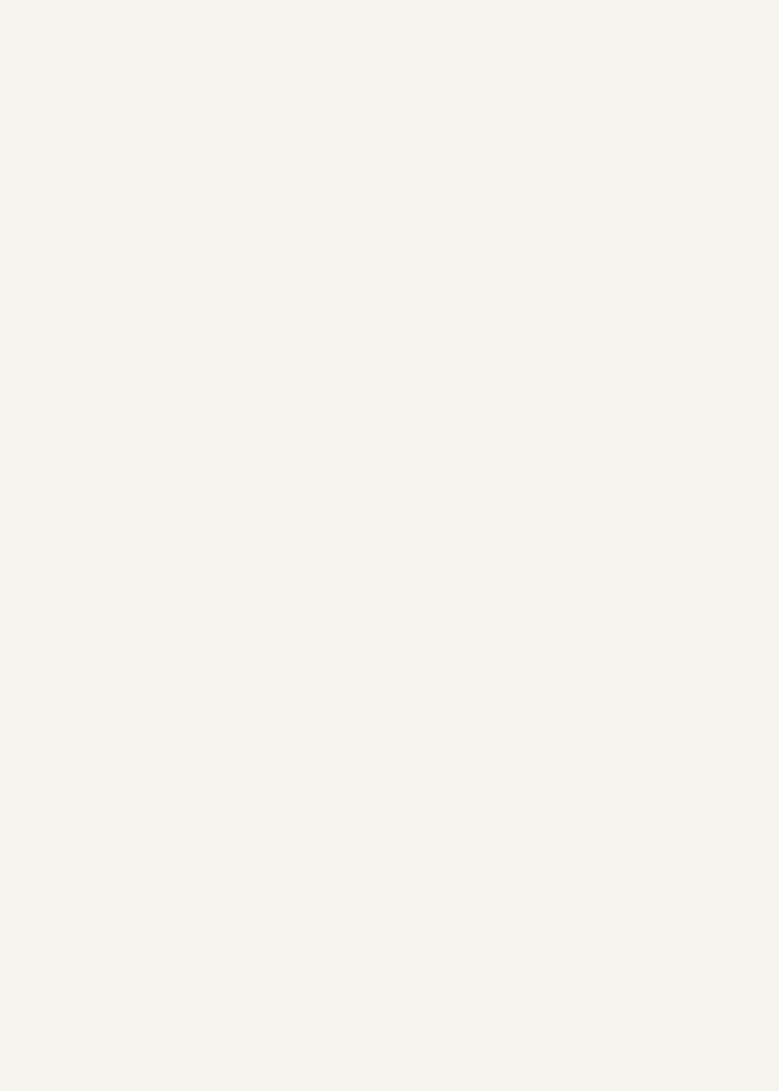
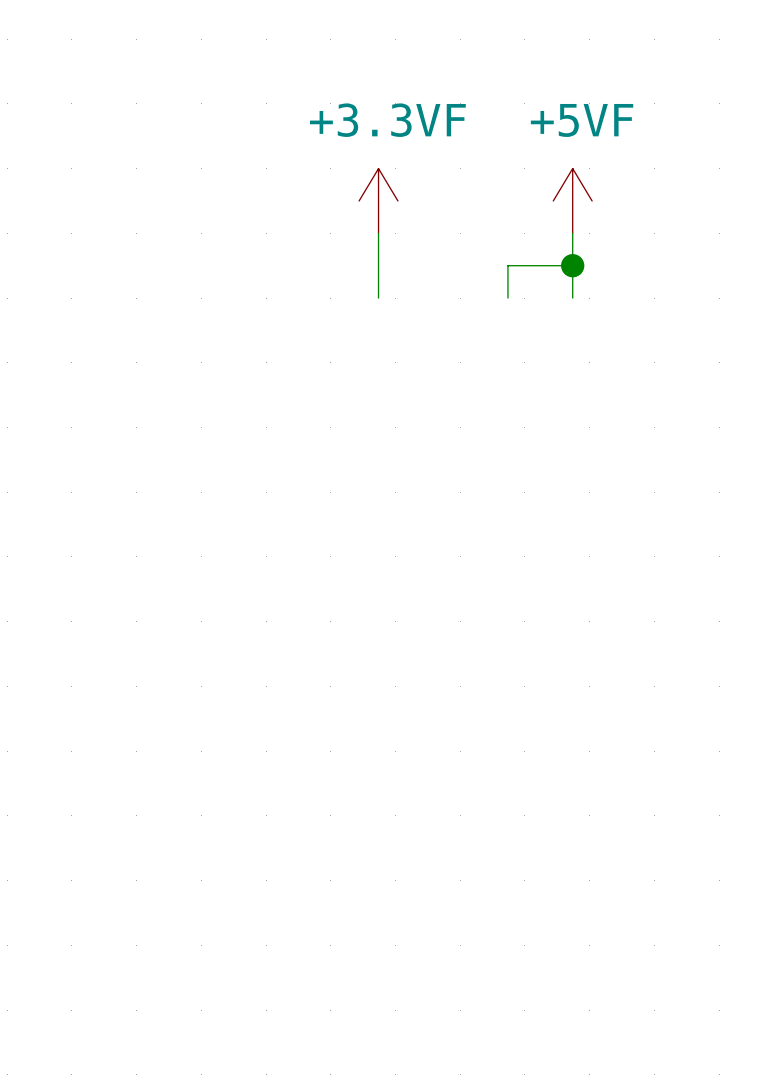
power symbol: none -> +3.3VF (378, 200)
power symbol: none -> +5VF (572, 200)
wire: none -> (378, 233) (378, 298)
wire: none -> (572, 233) (572, 298)
wire: none -> (572, 265) (507, 265) (507, 298)
junction: none -> (572, 265)

